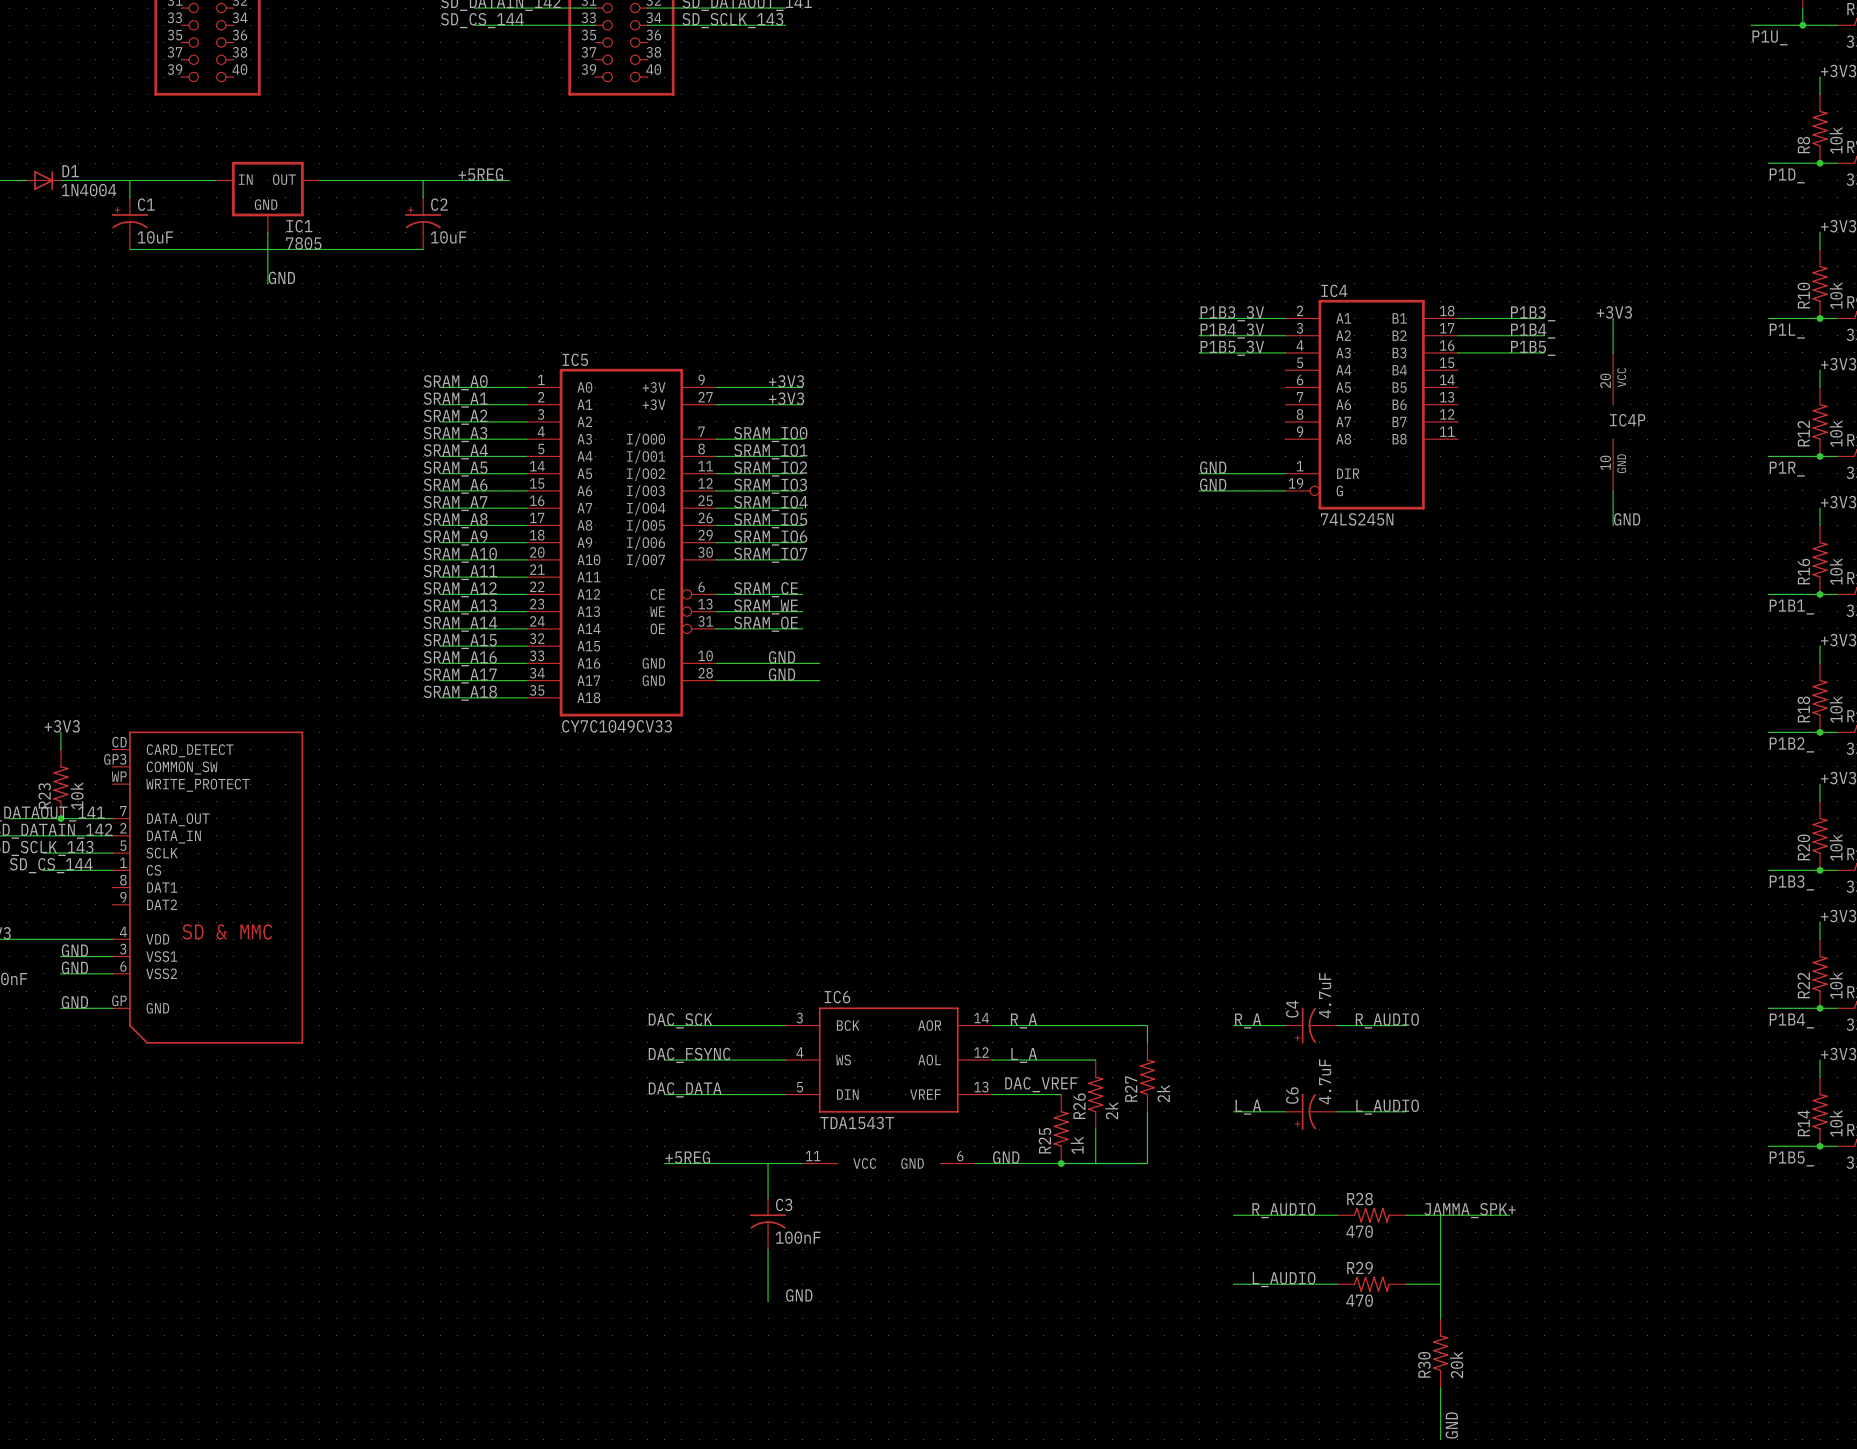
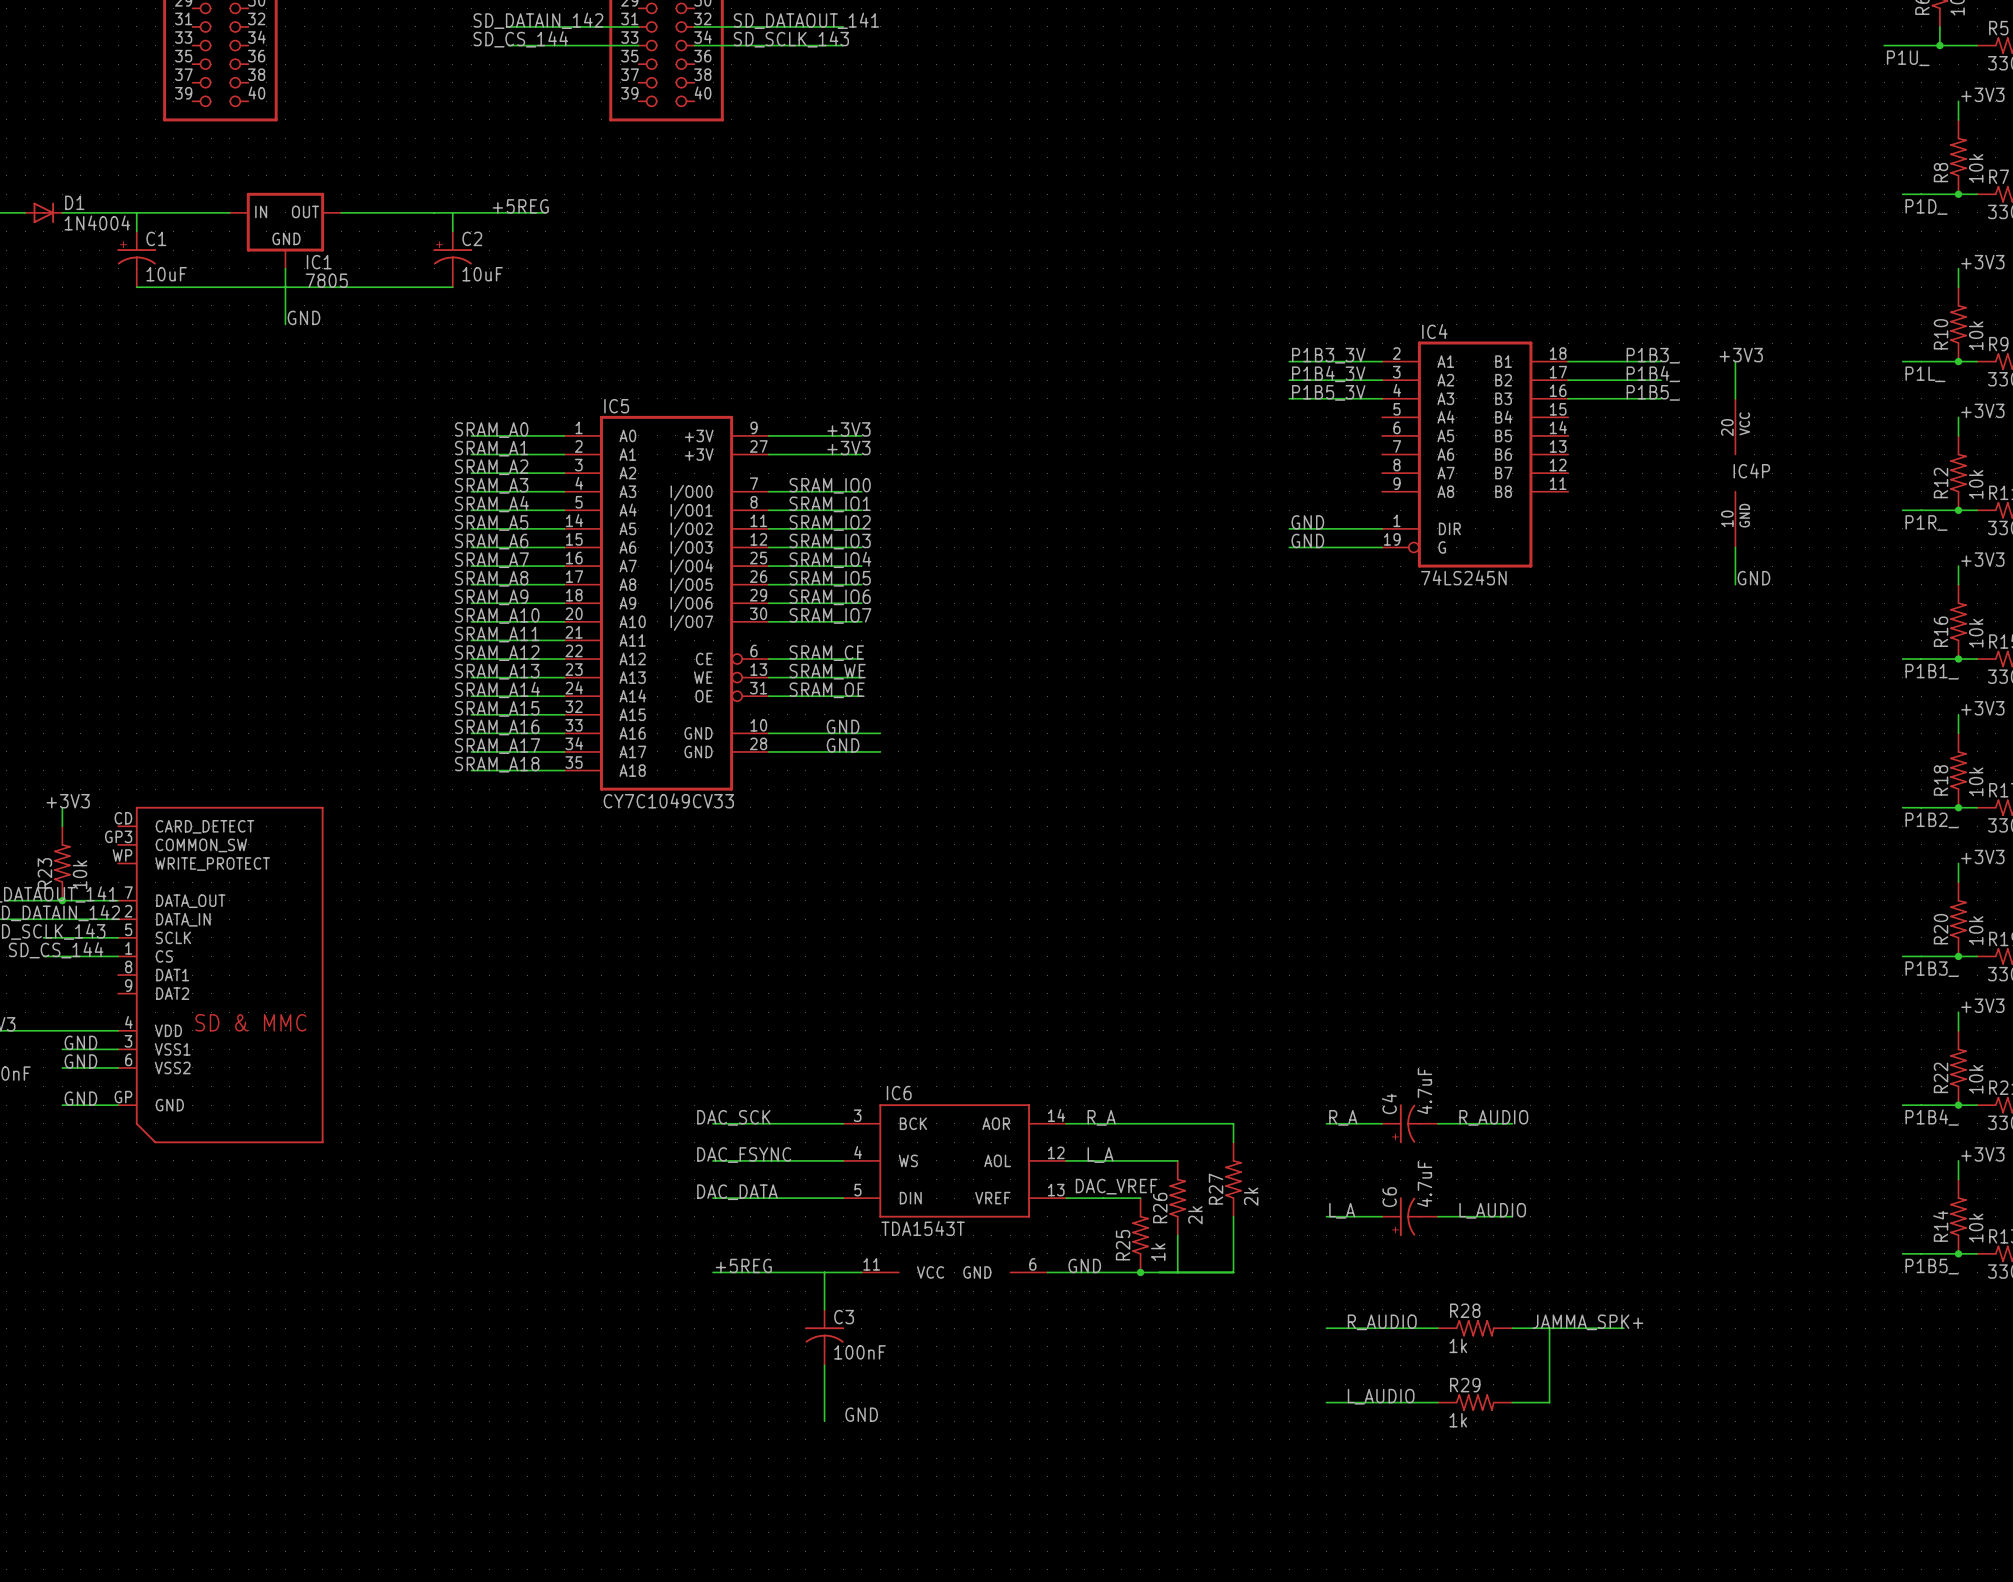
R28 value: 470 (1359, 1231) -> 1k (1458, 1345)
wire: (1440, 1284) (1440, 1318) -> none
R29 value: 470 (1359, 1300) -> 1k (1458, 1420)
R30: 20k (1440, 1353) -> none
wire: (1440, 1387) (1440, 1439) -> none
label: GND (1451, 1425) -> none

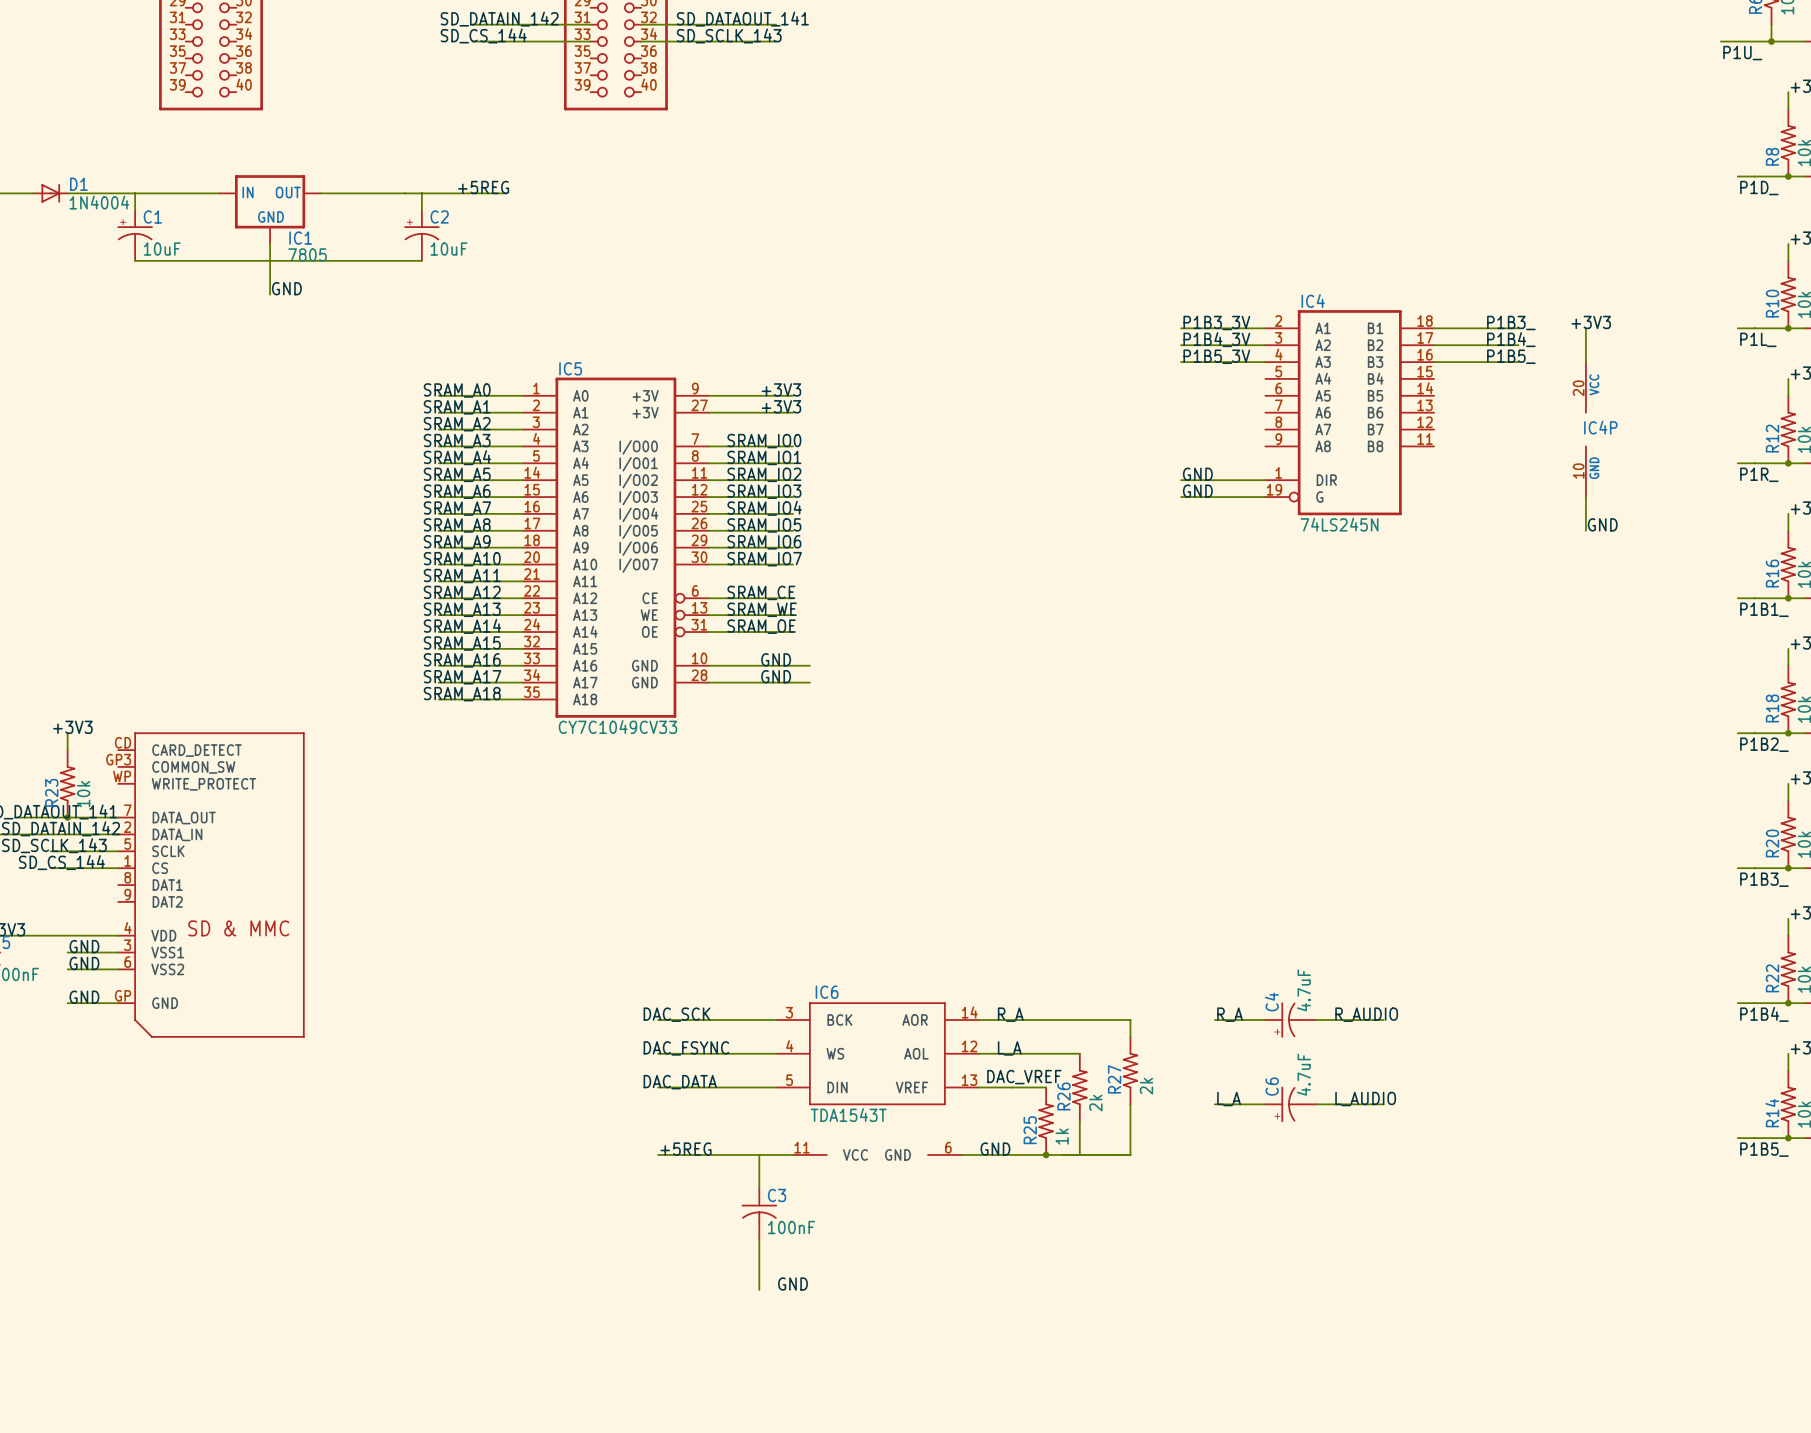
label: R_AUDIO (1382, 1322) -> none
label: JAMMA_SPK+ (1587, 1322) -> none
wire: (1326, 1328) (1437, 1328) -> none
R28: 1k (1475, 1328) -> none
wire: (1512, 1328) (1623, 1328) -> none
wire: (1549, 1328) (1549, 1402) (1512, 1402) -> none
label: L_AUDIO (1381, 1396) -> none
wire: (1326, 1402) (1437, 1402) -> none
R29: 1k (1475, 1402) -> none

